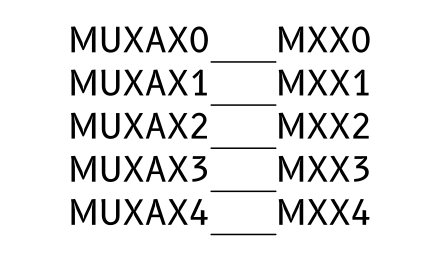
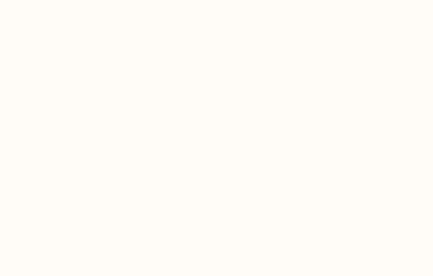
label: MUXAX0 (139, 39) -> none
label: MXX0 (324, 39) -> none
wire: (211, 61) (275, 61) -> none
label: MUXAX1 (138, 82) -> none
label: MXX1 (323, 82) -> none
wire: (211, 105) (275, 105) -> none
label: MUXAX2 (139, 125) -> none
label: MXX2 (323, 125) -> none
wire: (211, 148) (275, 148) -> none
label: MUXAX3 (139, 168) -> none
label: MXX3 (323, 168) -> none
wire: (211, 191) (275, 191) -> none
label: MXX4 (324, 211) -> none
label: MUXAX4 (139, 212) -> none
wire: (211, 234) (275, 234) -> none

